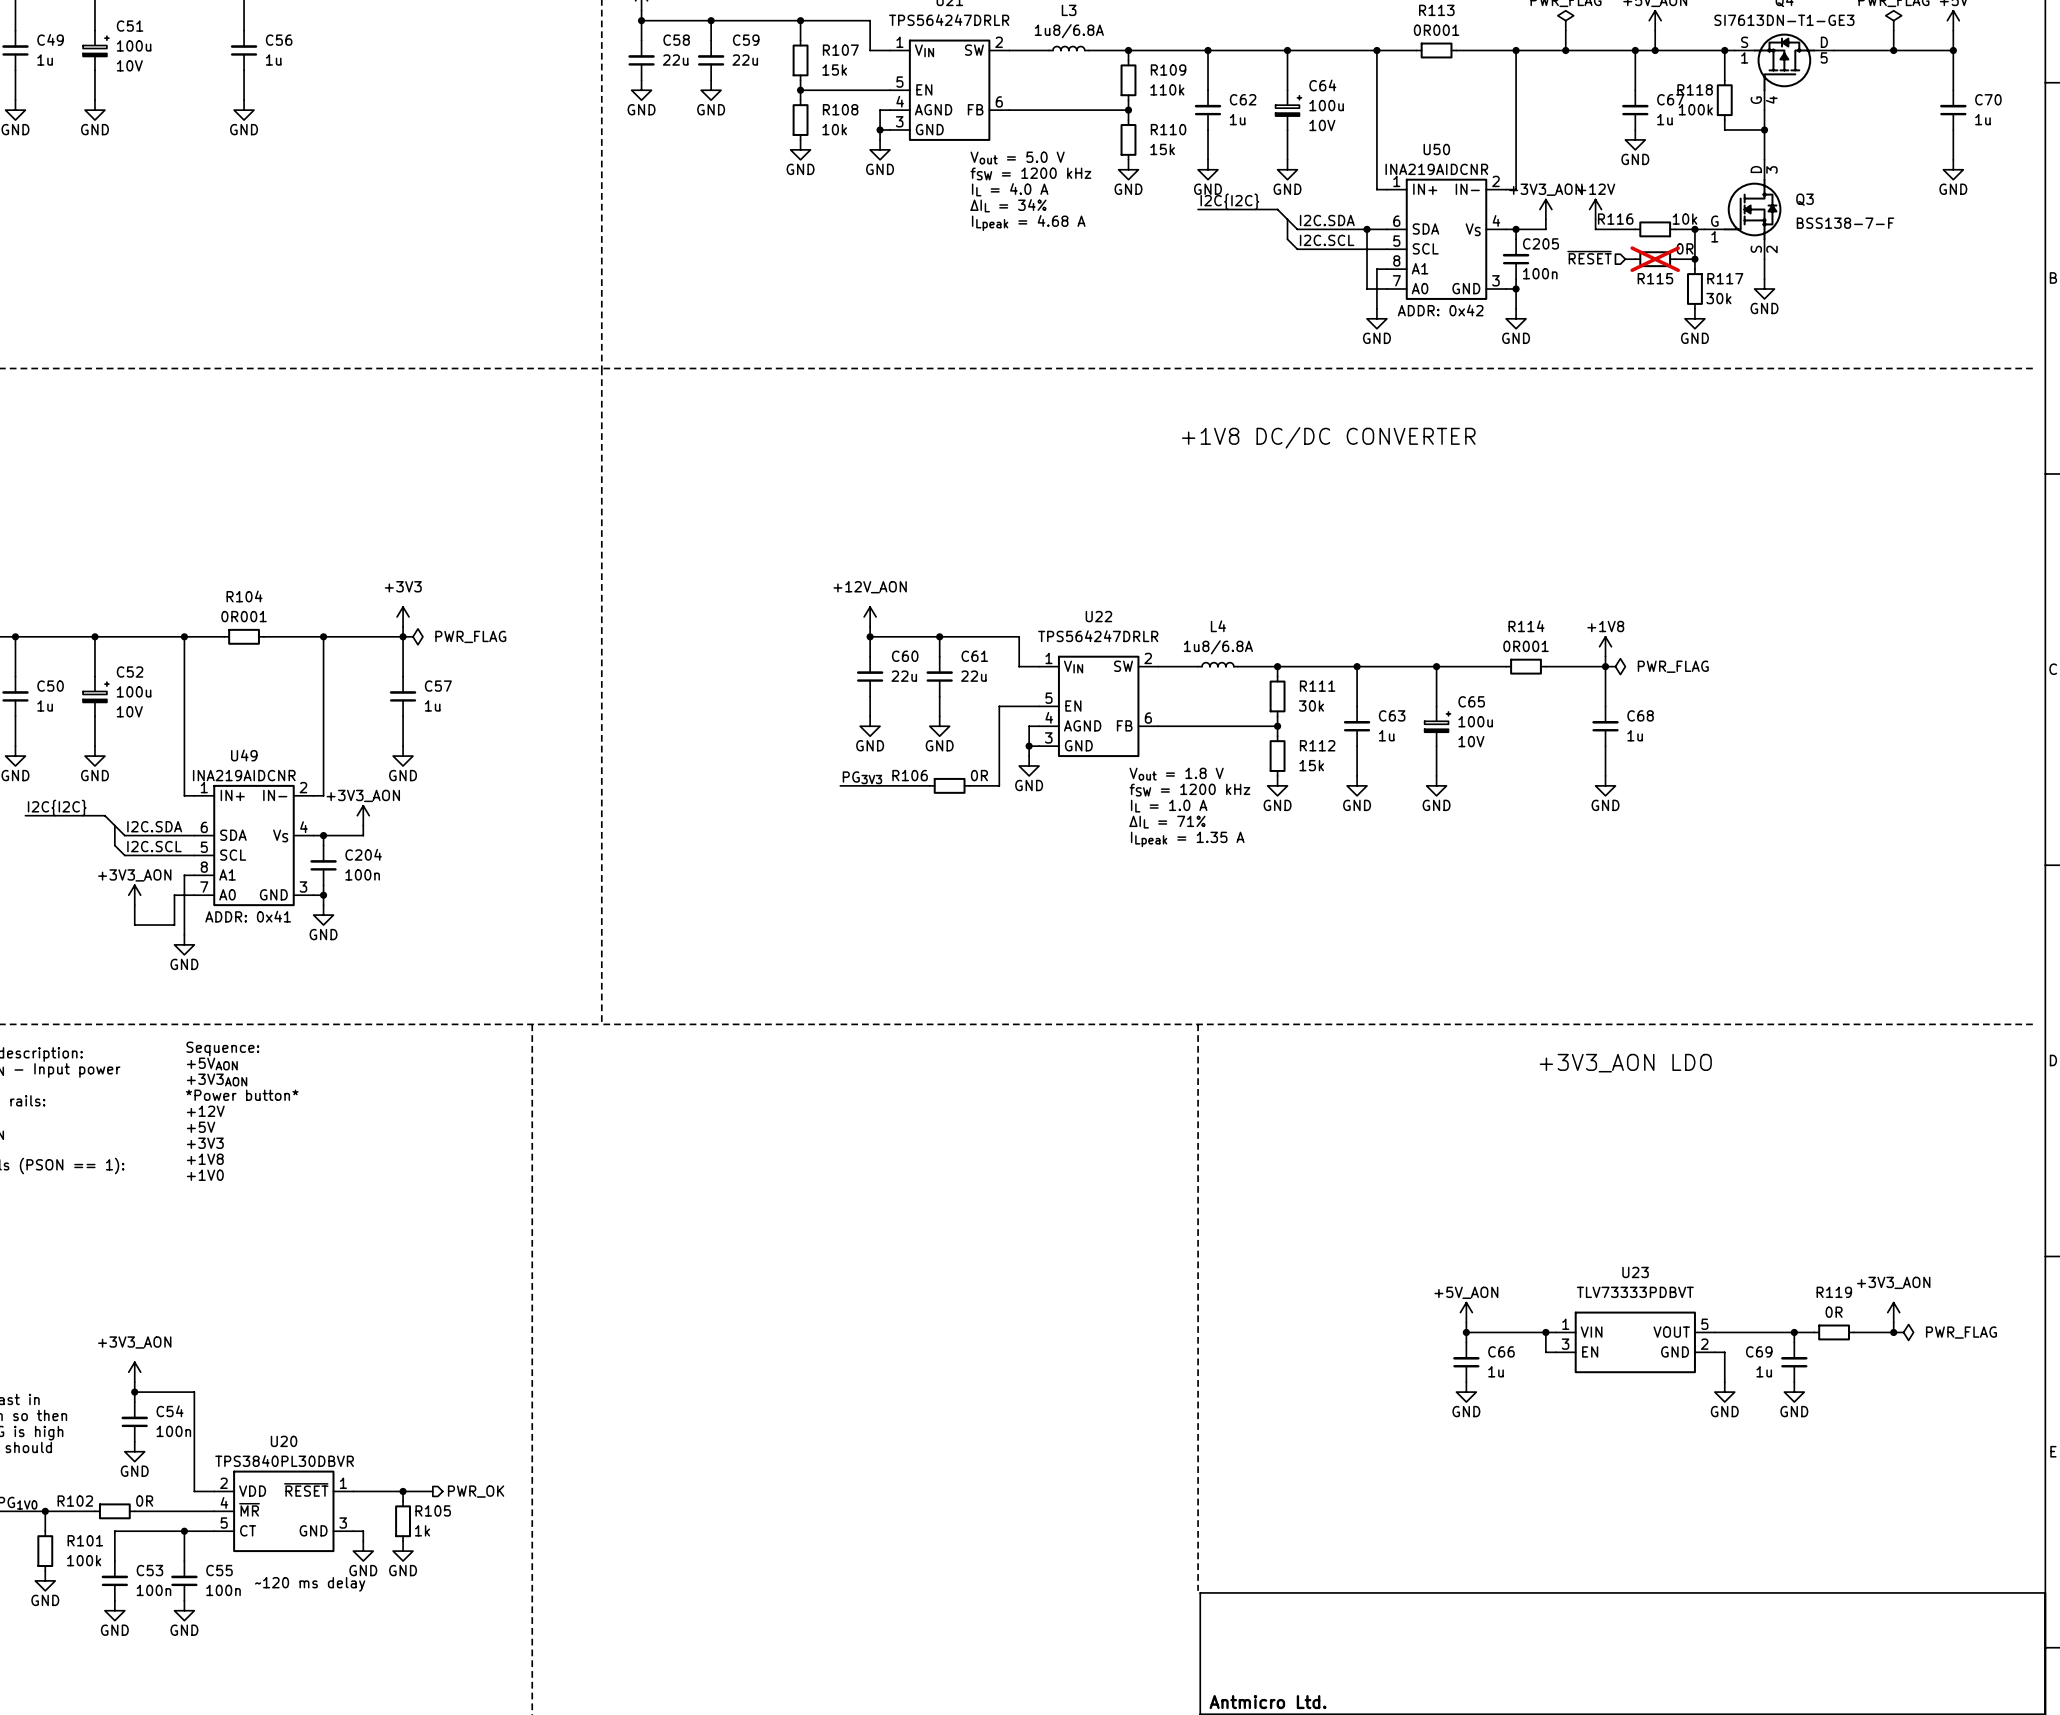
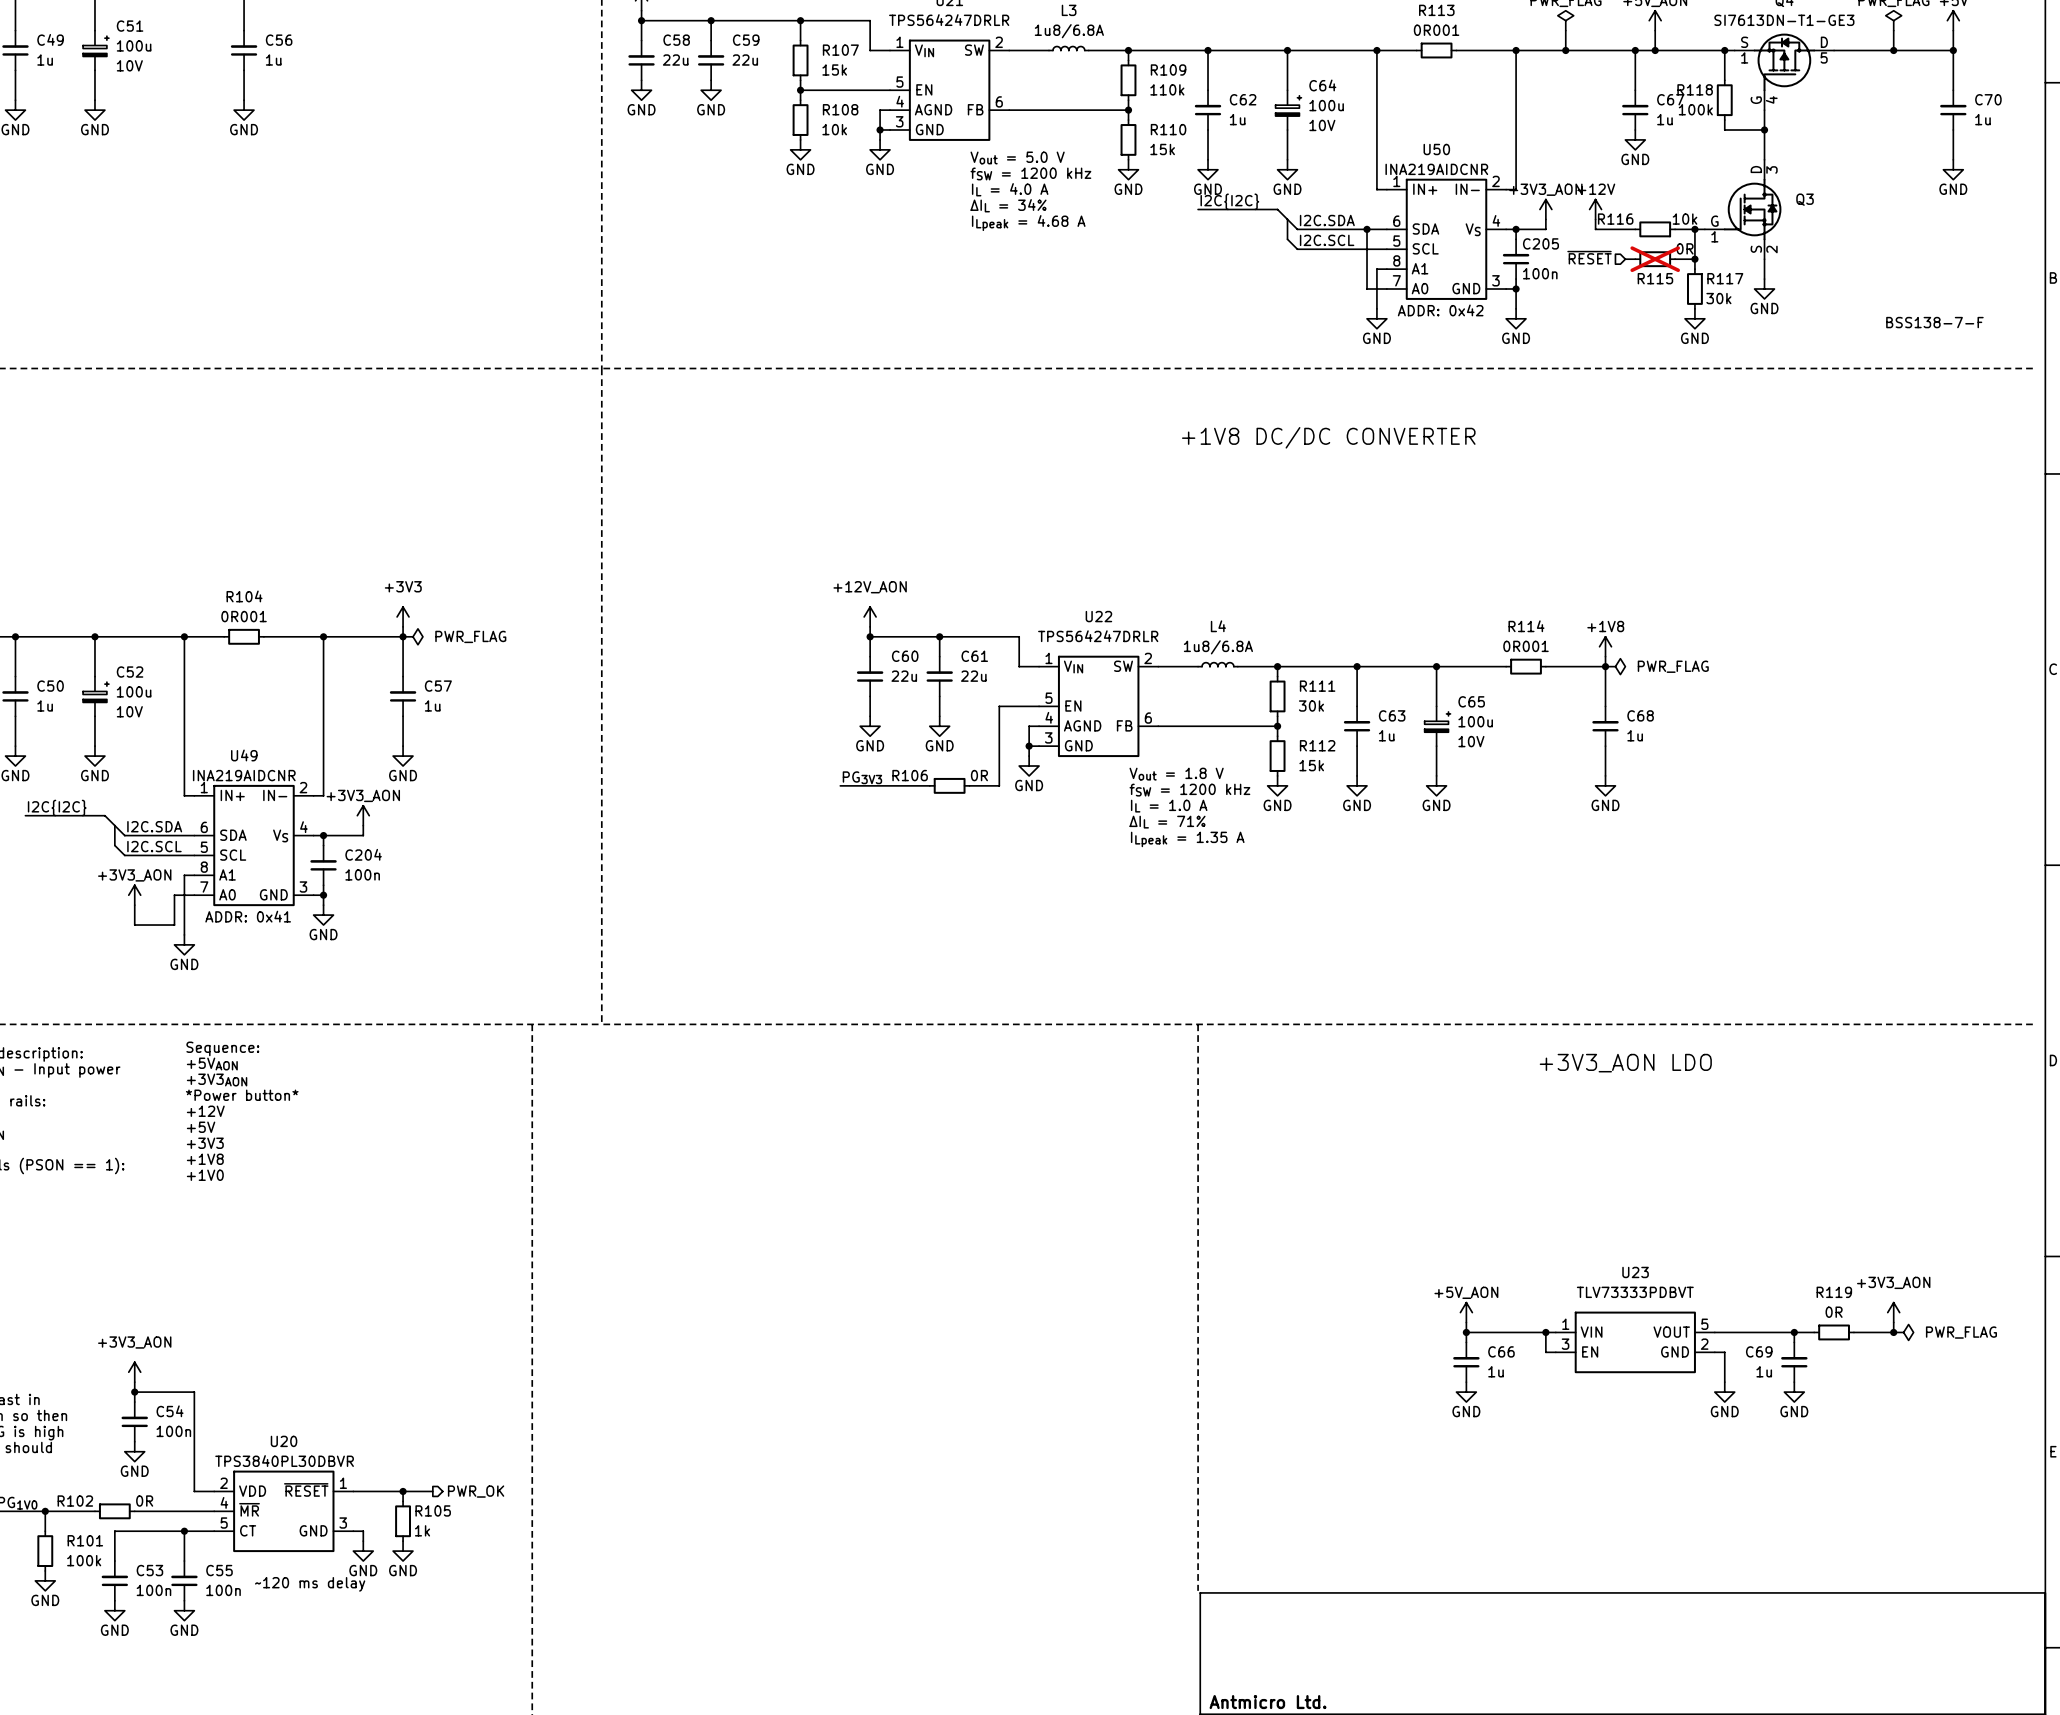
Q3 text position: BSS138-7-F (1845, 223) -> BSS138-7-F (1934, 322)

